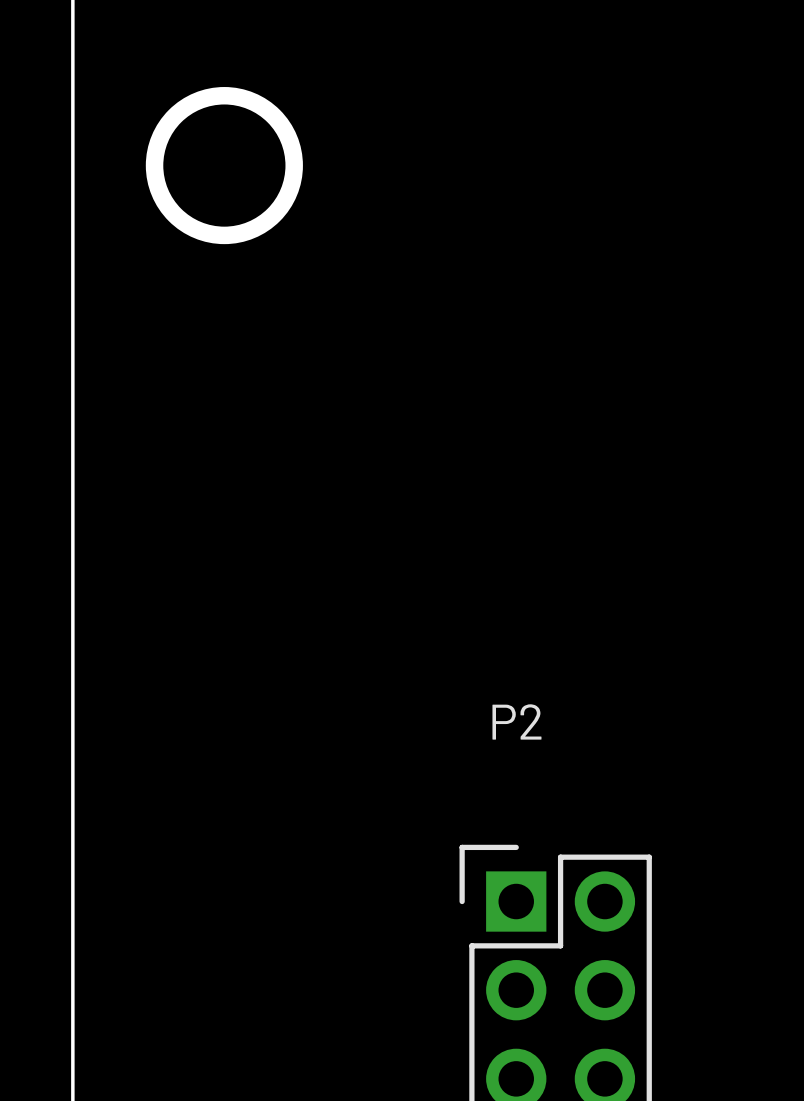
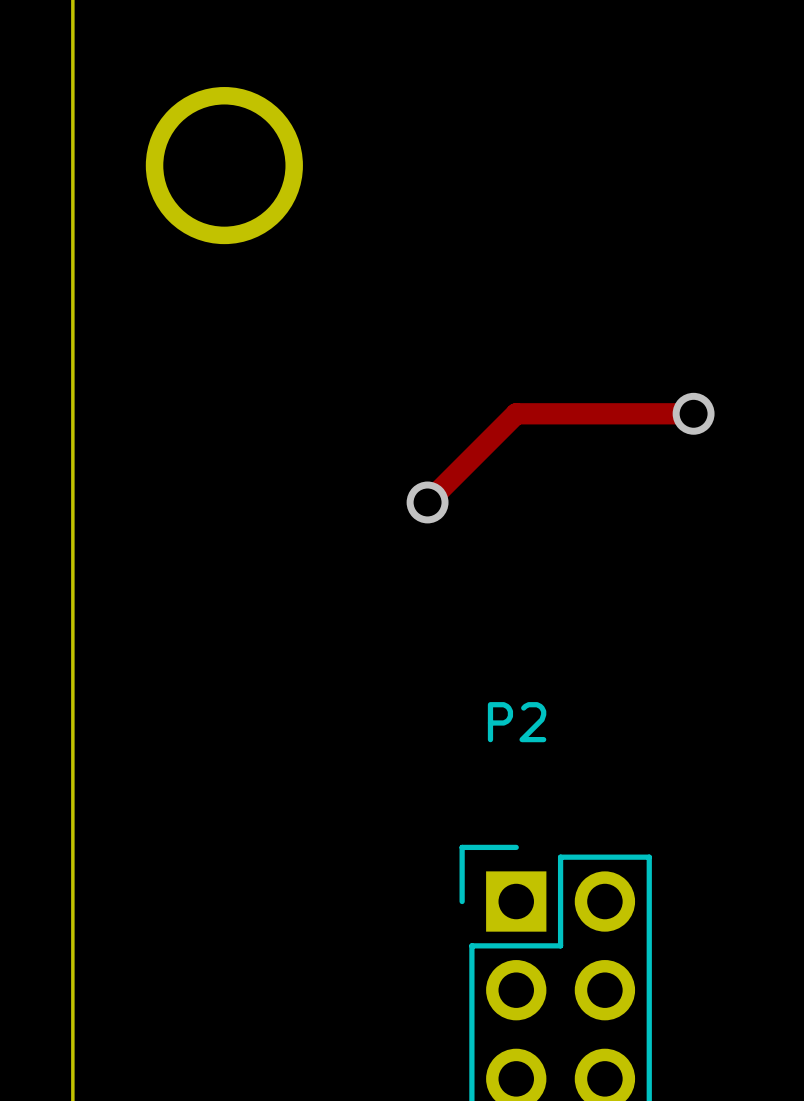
track: none -> (693, 413) (516, 413) (427, 502)
via: none -> (693, 413)
via: none -> (427, 502)

